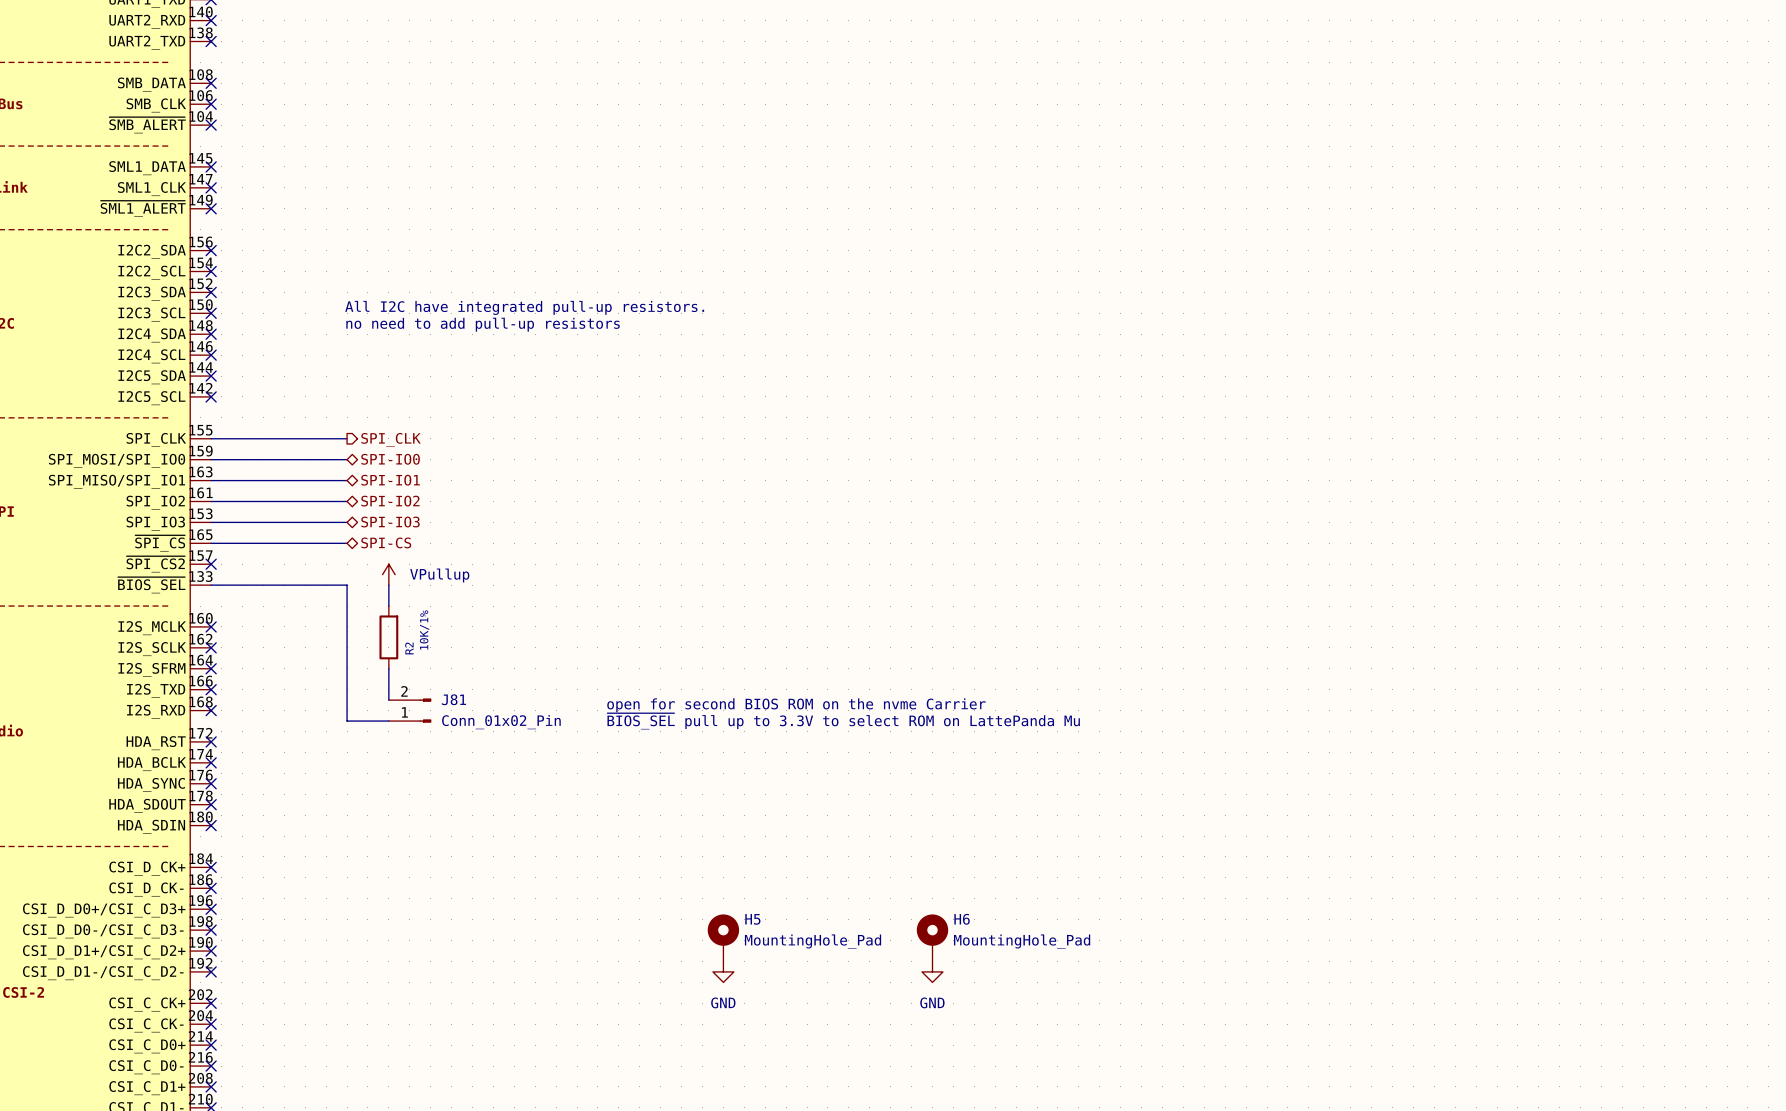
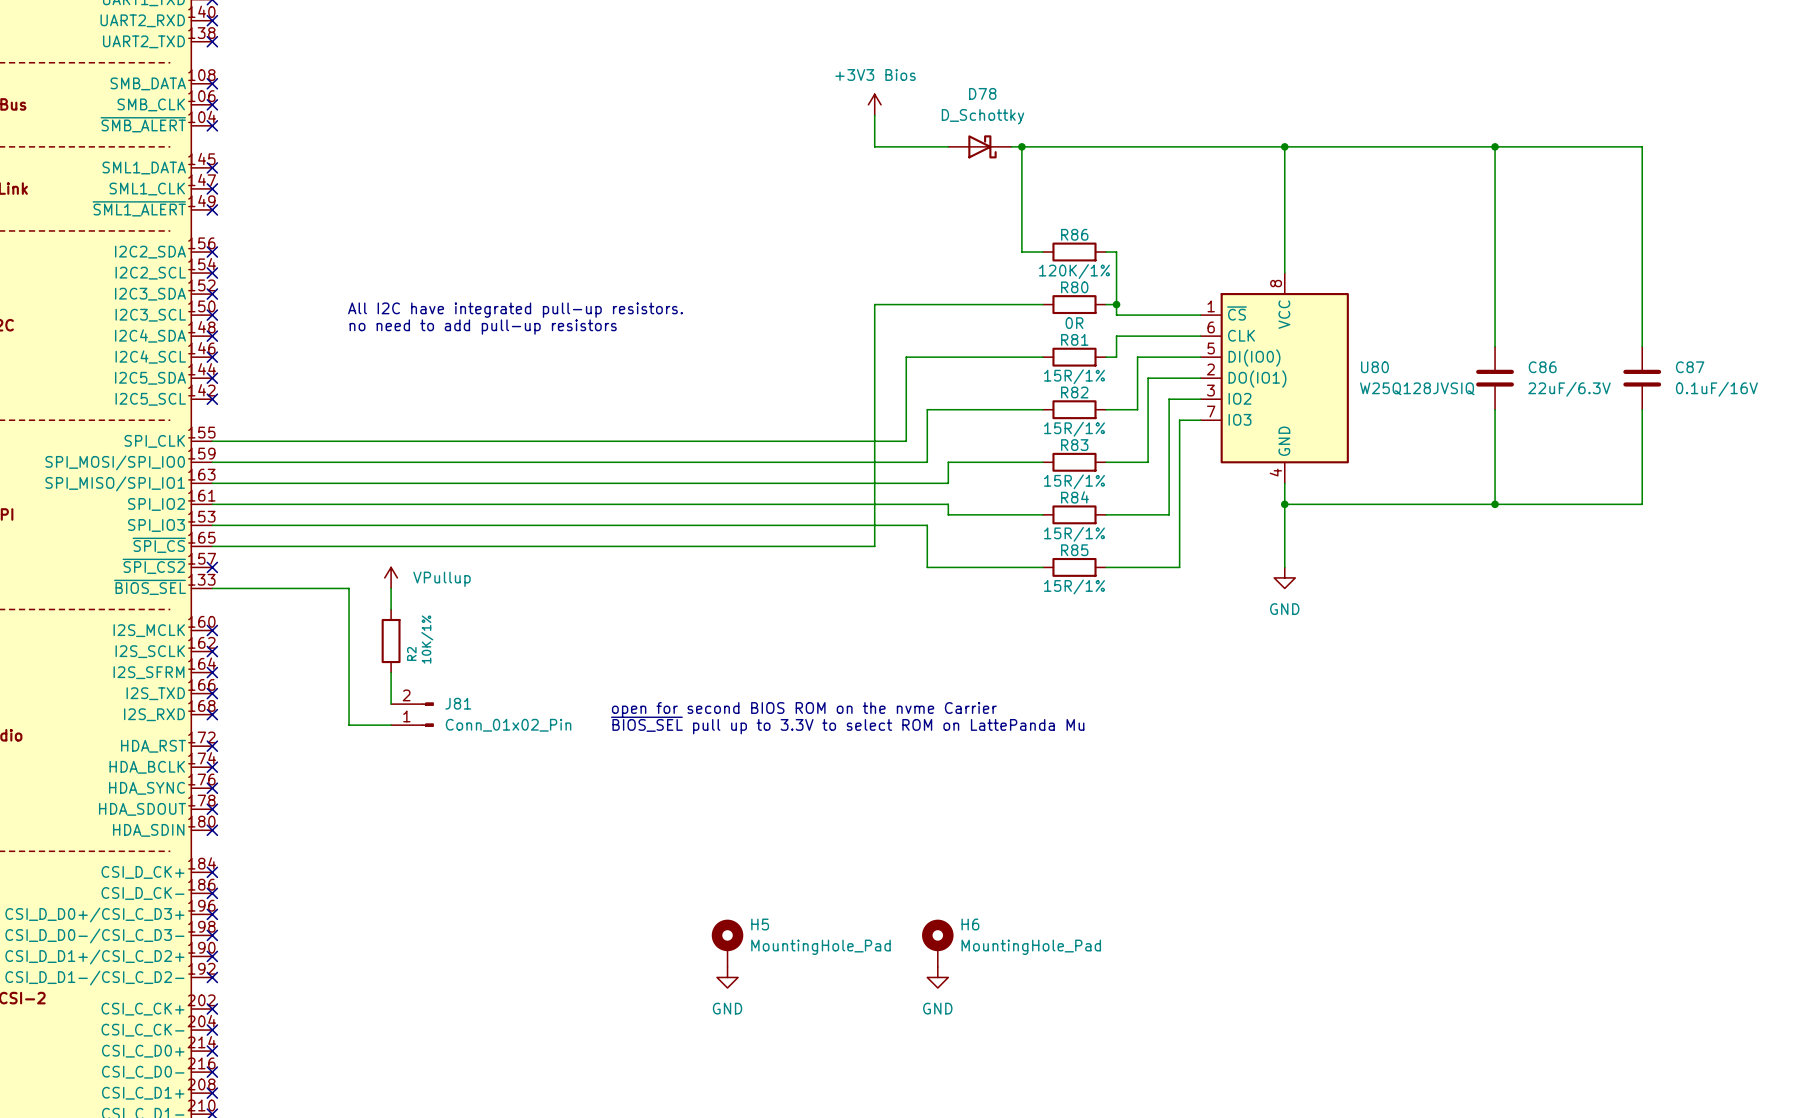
power symbol: none -> +3V3 Bios (874, 104)
wire: none -> (874, 115) (874, 146) (948, 146)
D78: none -> D_Schottky (979, 146)
wire: none -> (1011, 146) (1642, 146) (1642, 346)
wire: none -> (1021, 146) (1021, 252) (1042, 252)
junction: none -> (1021, 146)
wire: none -> (1284, 146) (1284, 273)
junction: none -> (1284, 146)
wire: none -> (1495, 146) (1495, 346)
junction: none -> (1495, 146)
R86: none -> 120K/1% (1074, 252)
wire: none -> (1106, 252) (1116, 252) (1116, 315) (1200, 315)
wire: none -> (1042, 304) (874, 304) (874, 546) (349, 546)
R80: none -> 0R (1074, 304)
wire: none -> (1106, 304) (1116, 304)
junction: none -> (1116, 304)
wire: none -> (1200, 336) (1116, 336) (1116, 357) (1106, 357)
wire: none -> (1042, 357) (906, 357) (906, 441) (349, 441)
R81: none -> 15R/1% (1074, 357)
wire: none -> (1200, 357) (1137, 357) (1137, 409) (1106, 409)
wire: none -> (1200, 378) (1148, 378) (1148, 462) (1106, 462)
U80: none -> W25Q128JVSIQ (1274, 378)
C86: none -> 22uF/6.3V (1495, 378)
C87: none -> 0.1uF/16V (1642, 378)
wire: none -> (1200, 399) (1169, 399) (1169, 514) (1106, 514)
wire: none -> (1042, 409) (927, 409) (927, 462) (349, 462)
R82: none -> 15R/1% (1074, 409)
wire: none -> (1495, 409) (1495, 504)
wire: none -> (1642, 409) (1642, 504) (1284, 504)
wire: none -> (1200, 420) (1179, 420) (1179, 567) (1106, 567)
hierarchical label: SPI_CLK (391, 439) -> none
hierarchical label: SPI-IO0 (390, 459) -> none
wire: none -> (1042, 462) (948, 462) (948, 483) (349, 483)
R83: none -> 15R/1% (1074, 462)
hierarchical label: SPI-IO1 (390, 480) -> none
wire: none -> (1284, 483) (1284, 567)
wire: none -> (349, 504) (948, 504) (948, 514) (1042, 514)
hierarchical label: SPI-IO2 (390, 501) -> none
junction: none -> (1284, 504)
junction: none -> (1495, 504)
R84: none -> 15R/1% (1074, 514)
wire: none -> (349, 525) (927, 525) (927, 567) (1042, 567)
hierarchical label: SPI-IO3 (390, 522) -> none
hierarchical label: SPI-CS (386, 542) -> none
R85: none -> 15R/1% (1074, 567)
power symbol: none -> GND (1284, 577)

